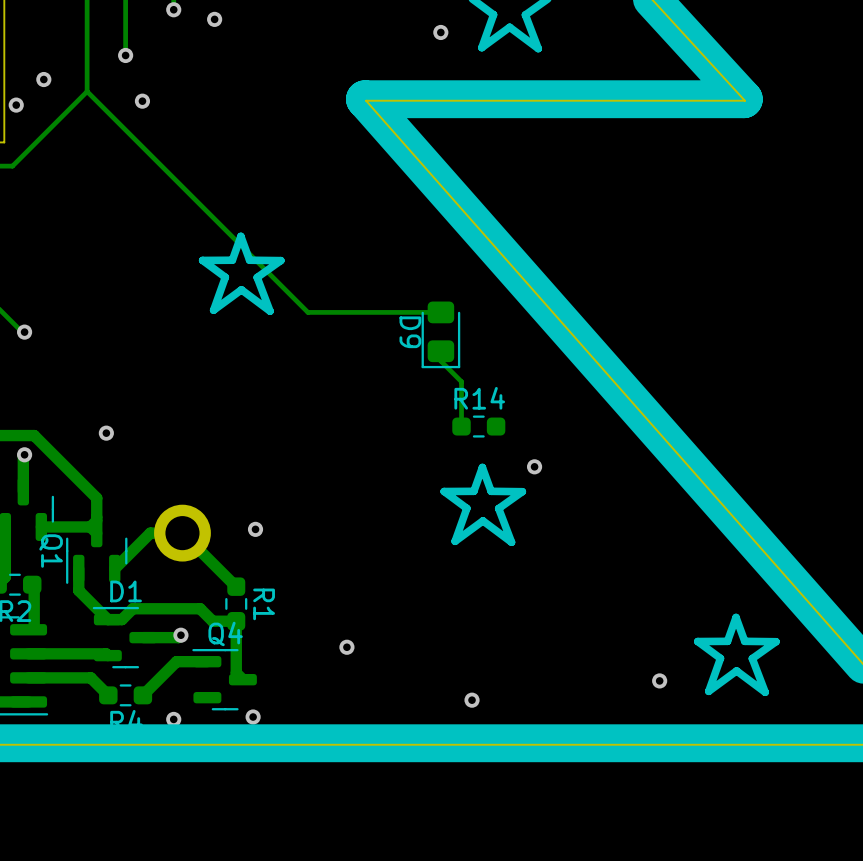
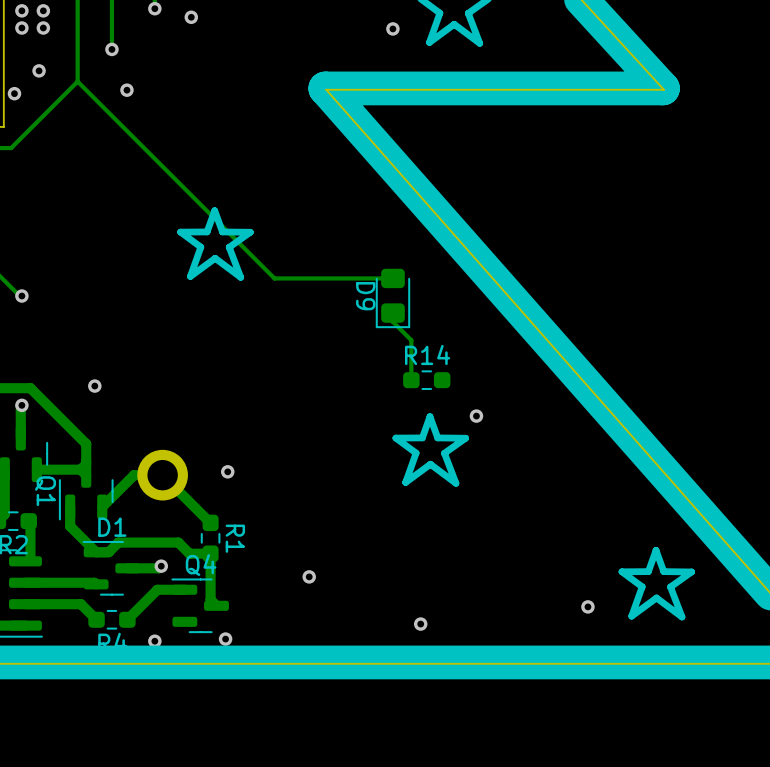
via: none -> (21, 10)
via: none -> (43, 10)
via: none -> (21, 27)
via: none -> (43, 27)

